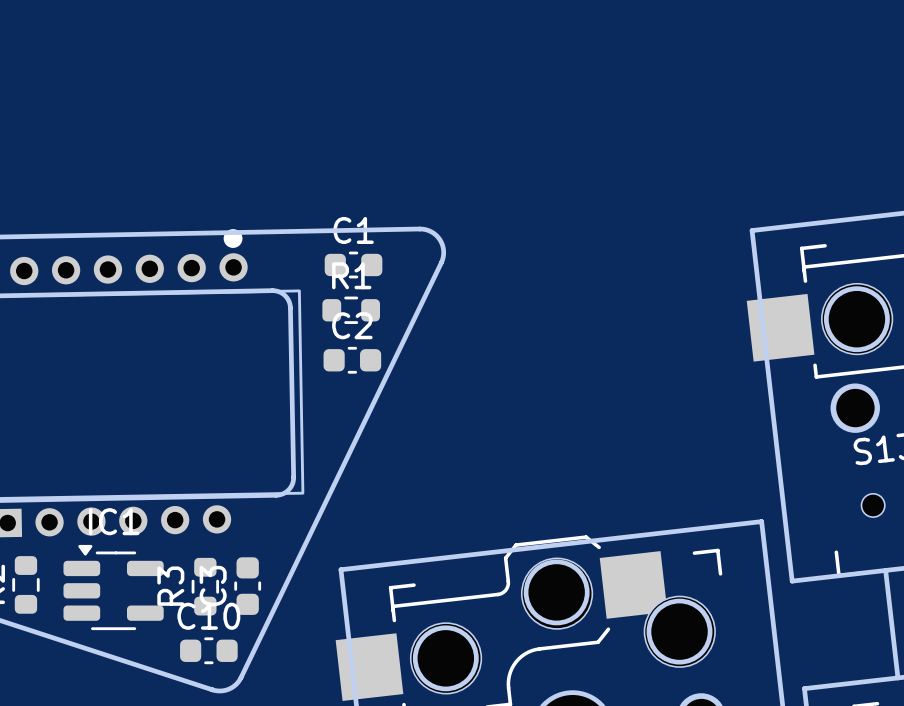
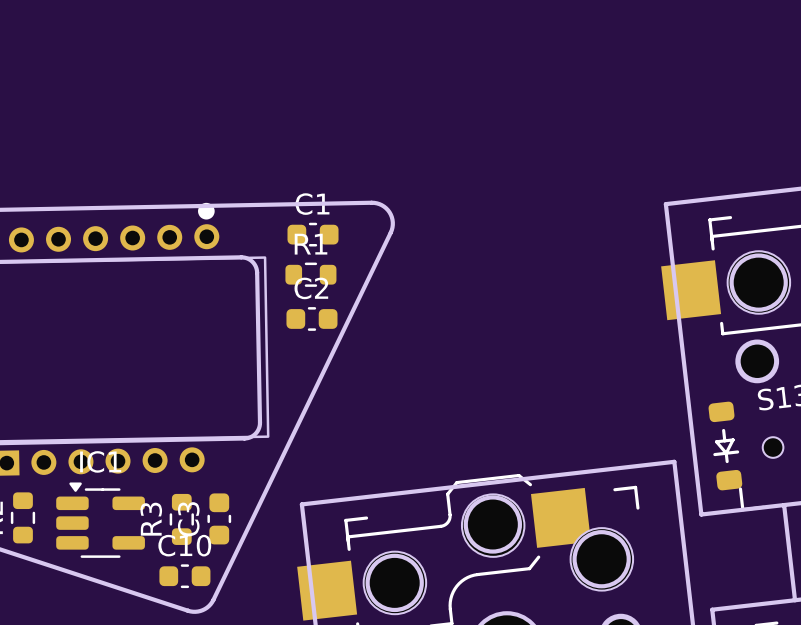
part: none -> (725, 446)

